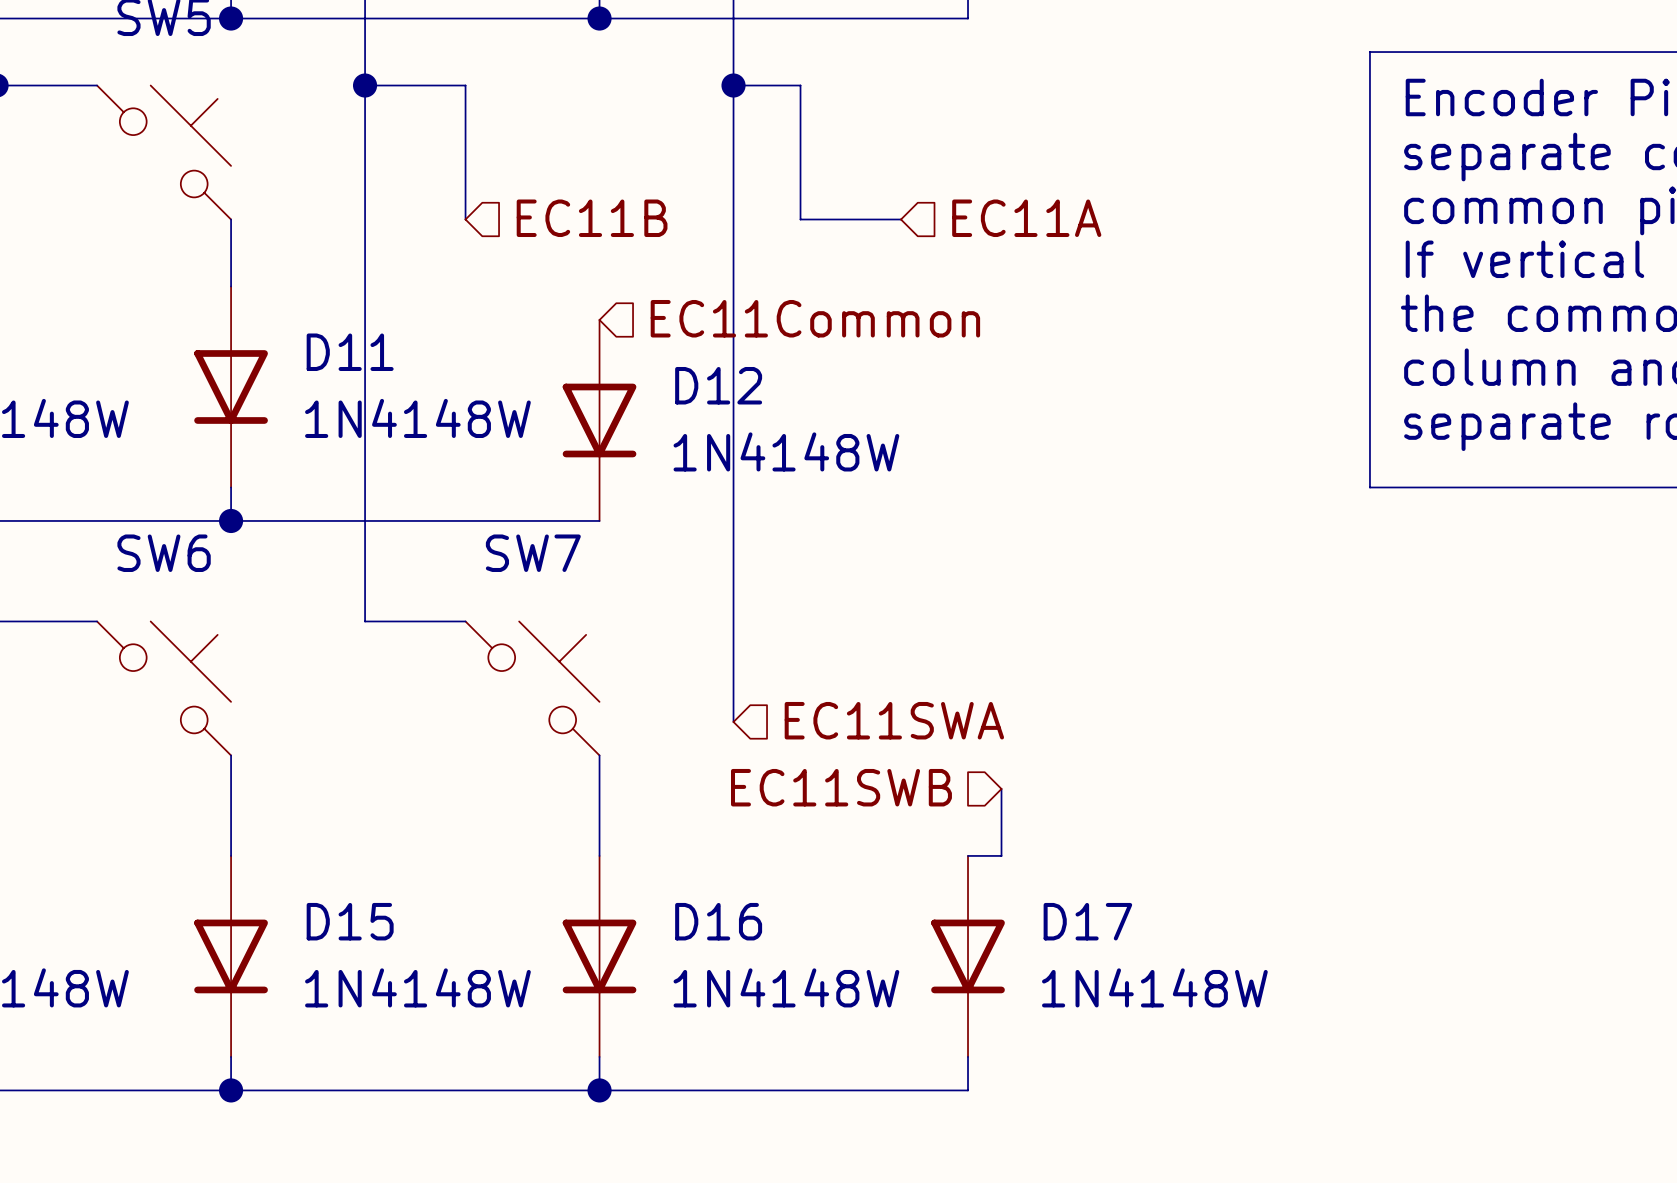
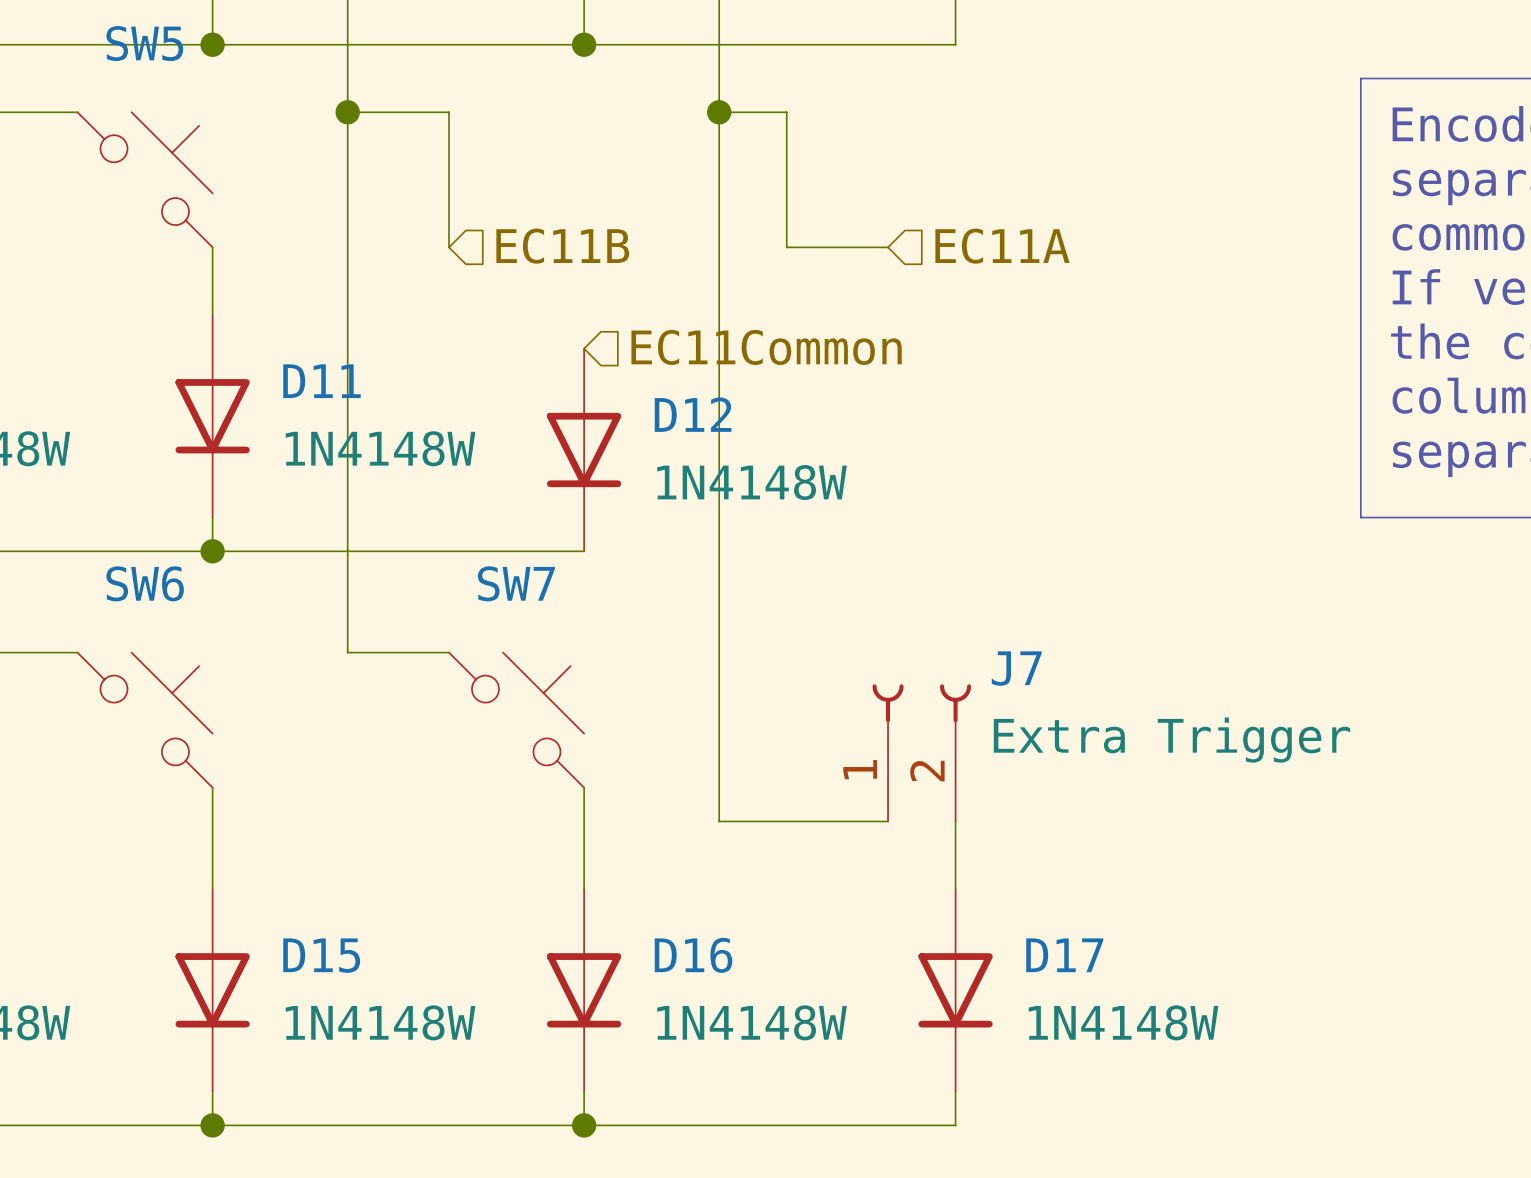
hierarchical label: EC11SWA (894, 720) -> none
J7: none -> Extra Trigger (921, 752)
wire: none -> (719, 753) (719, 821) (888, 821)
hierarchical label: EC11SWB (841, 787) -> none
wire: (1001, 788) (1001, 855) (968, 855) -> (955, 821) (955, 889)

